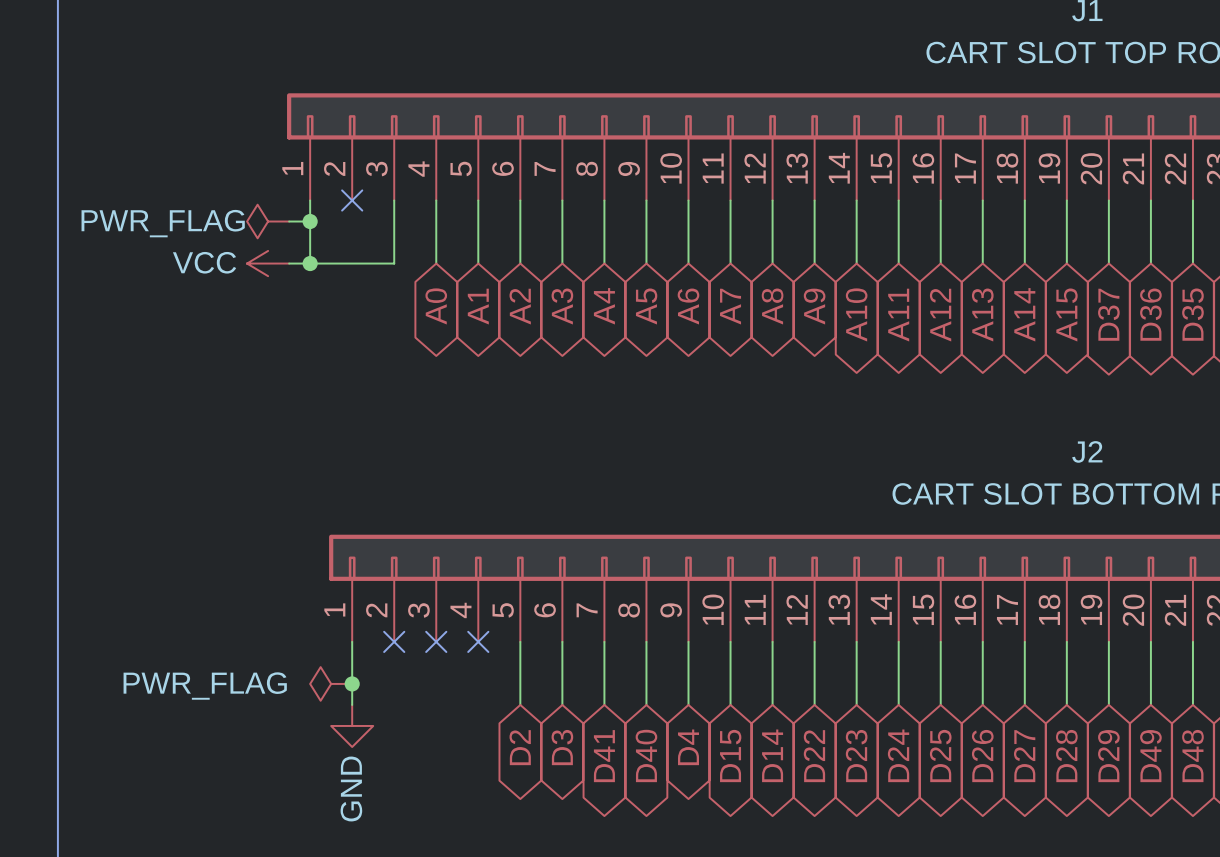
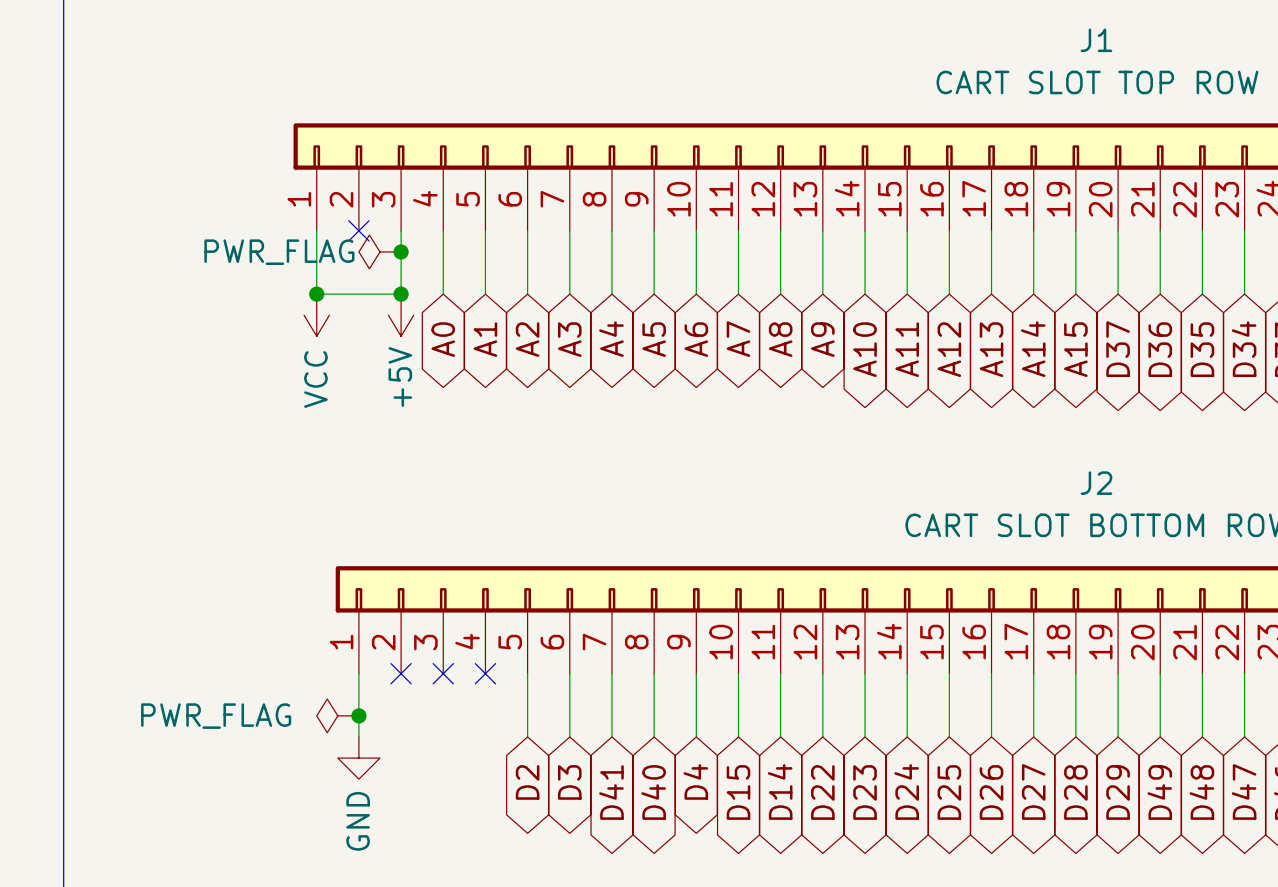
power symbol position: PWR_FLAG (268, 221) -> PWR_FLAG (380, 251)
wire: (289, 221) (310, 221) -> none
junction: (310, 221) -> none
junction: none -> (401, 251)
power symbol rotation: 0° (268, 263) -> 90° counterclockwise (316, 315)
power symbol position: VCC (268, 263) -> VCC (316, 315)
wire: (289, 263) (310, 263) -> none
junction: none -> (401, 294)
power symbol: none -> +5V (401, 315)

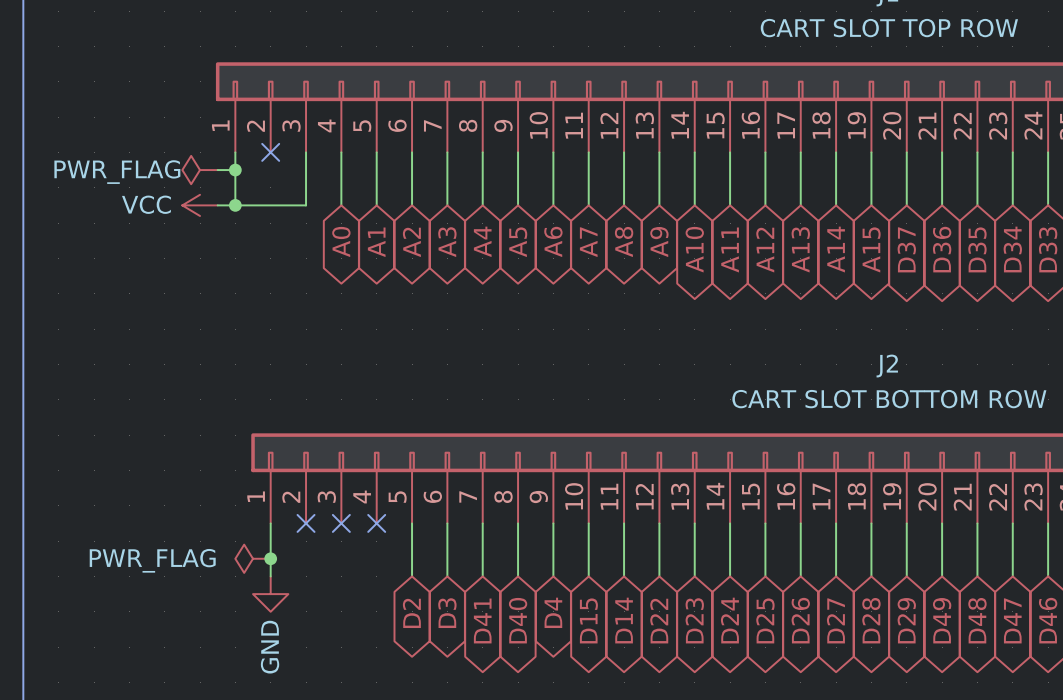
wire: none -> (217, 170) (235, 170)
junction: none -> (235, 170)
power symbol position: PWR_FLAG (380, 251) -> PWR_FLAG (200, 170)
junction: (401, 251) -> none
wire: none -> (217, 205) (235, 205)
junction: (401, 294) -> none
power symbol rotation: 0° (316, 315) -> 90° clockwise (200, 205)
power symbol position: VCC (316, 315) -> VCC (200, 205)
power symbol: +5V (401, 315) -> none

